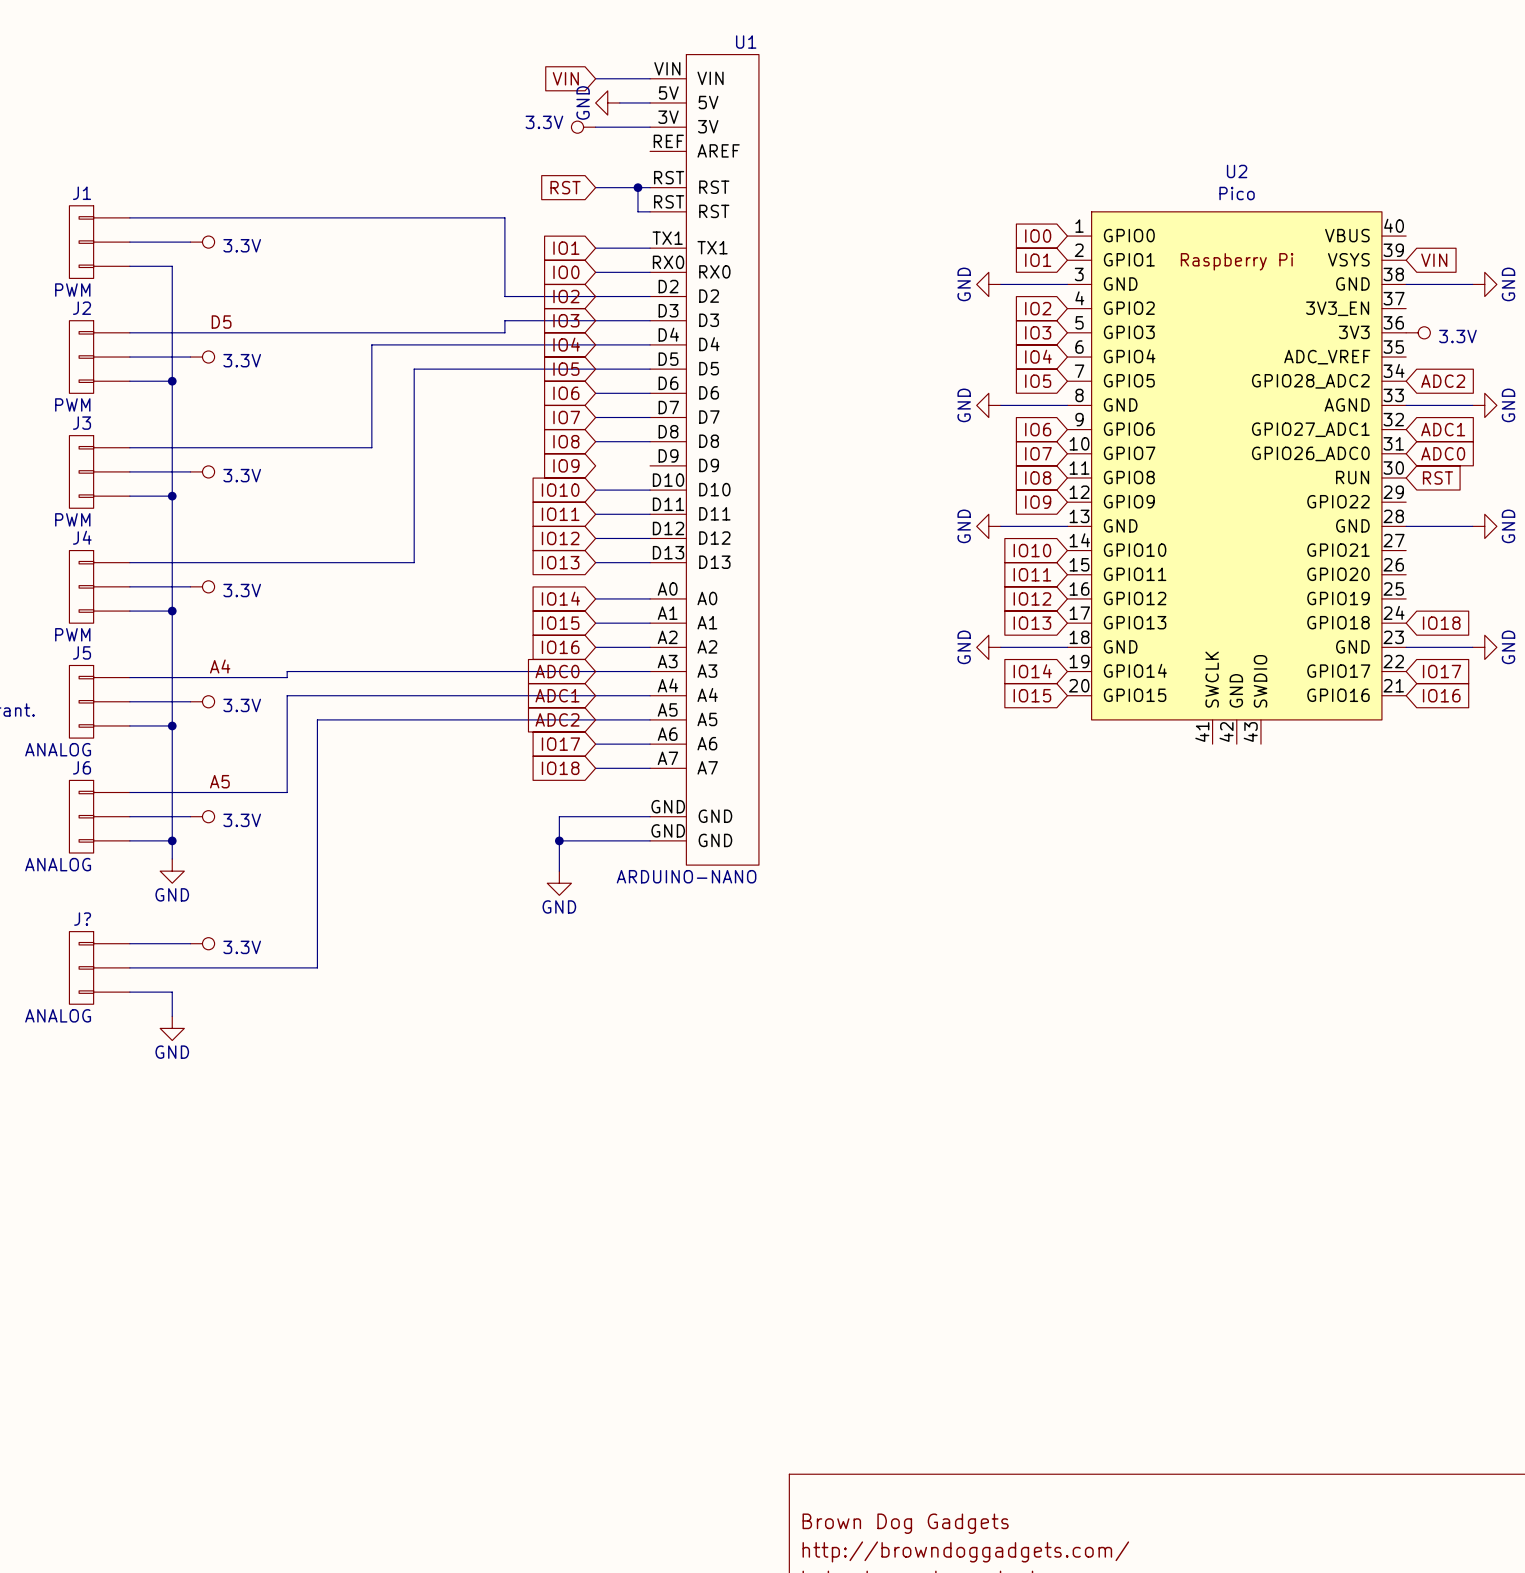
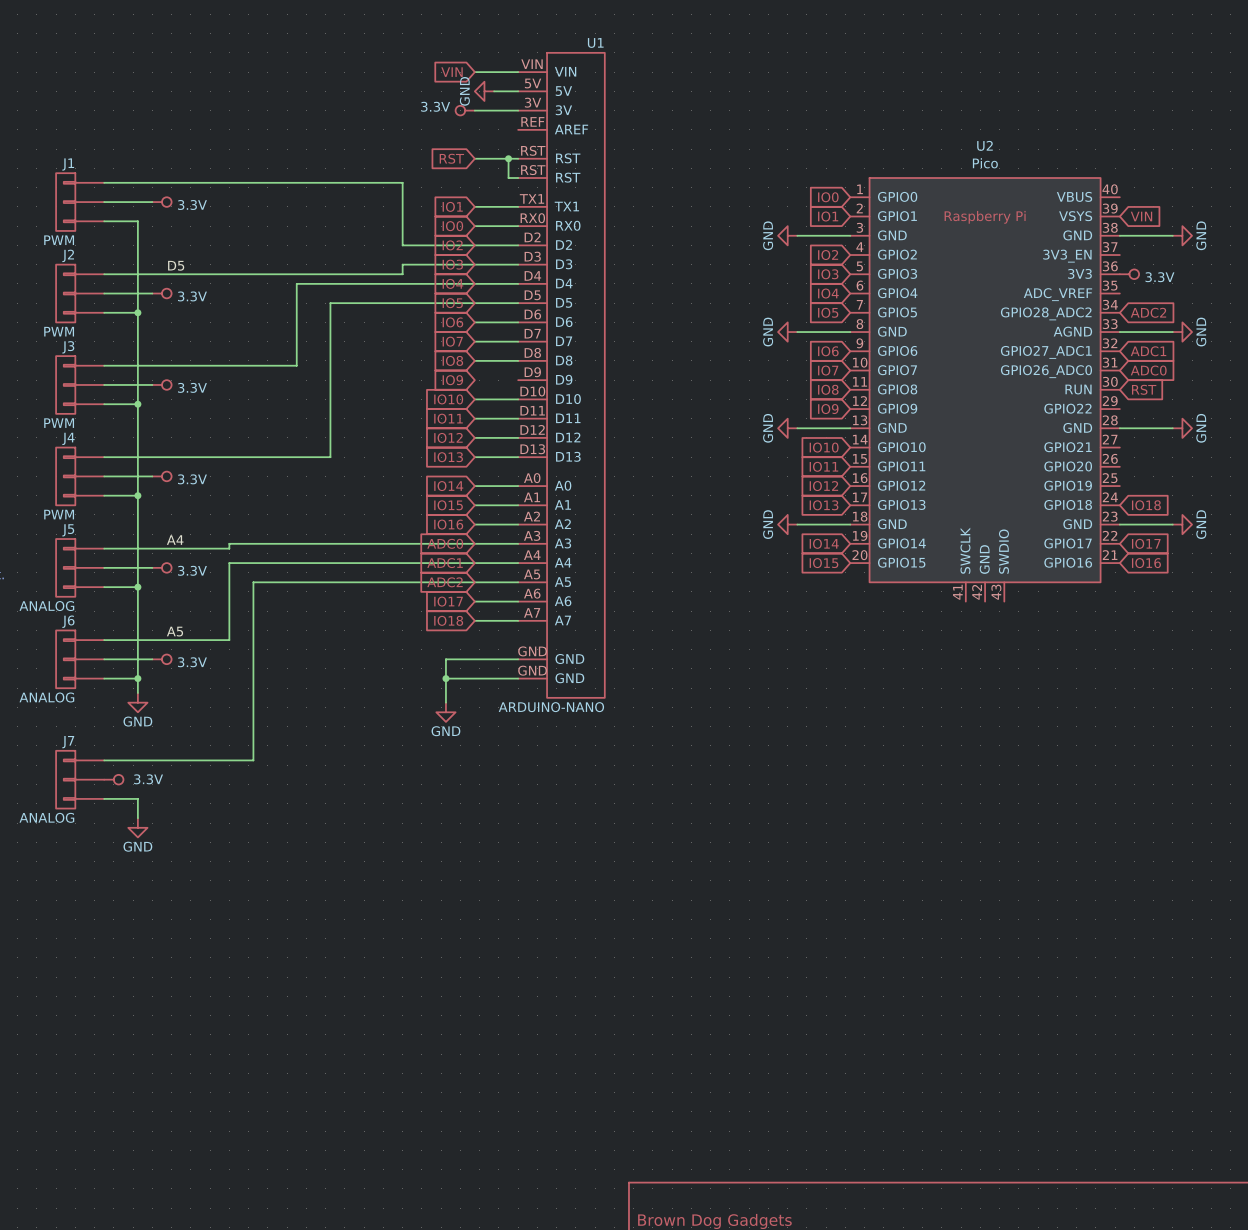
J? name: J? (82, 919) -> J7 (68, 742)
power symbol position: 3.3V (202, 943) -> 3.3V (113, 779)
wire: (317, 943) (317, 967) (129, 967) -> (253, 760) (152, 760)
power symbol text position: 3.3V (242, 947) -> 3.3V (148, 779)

